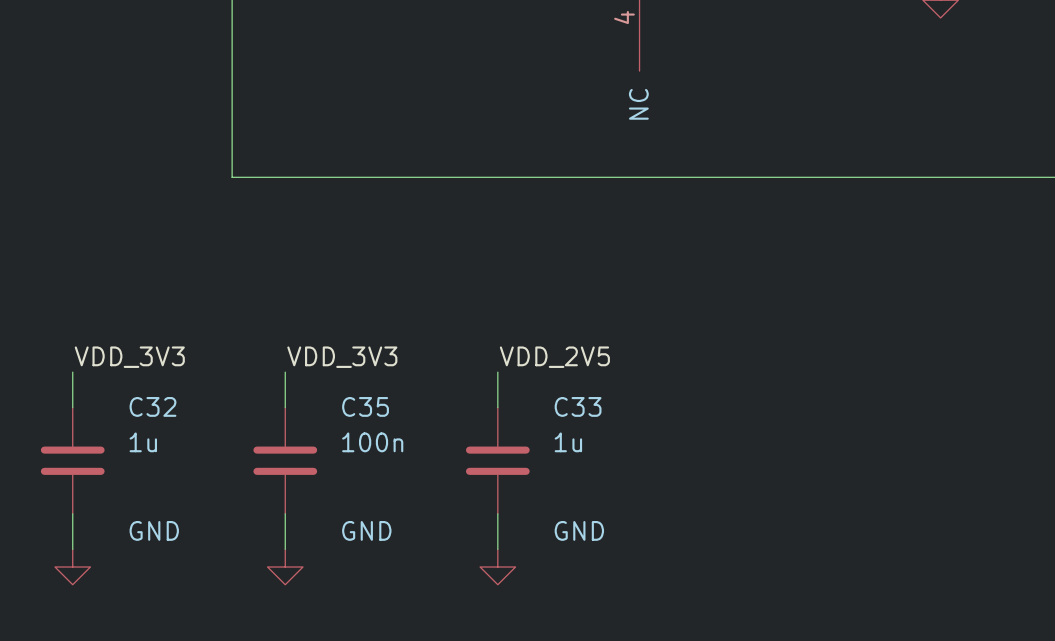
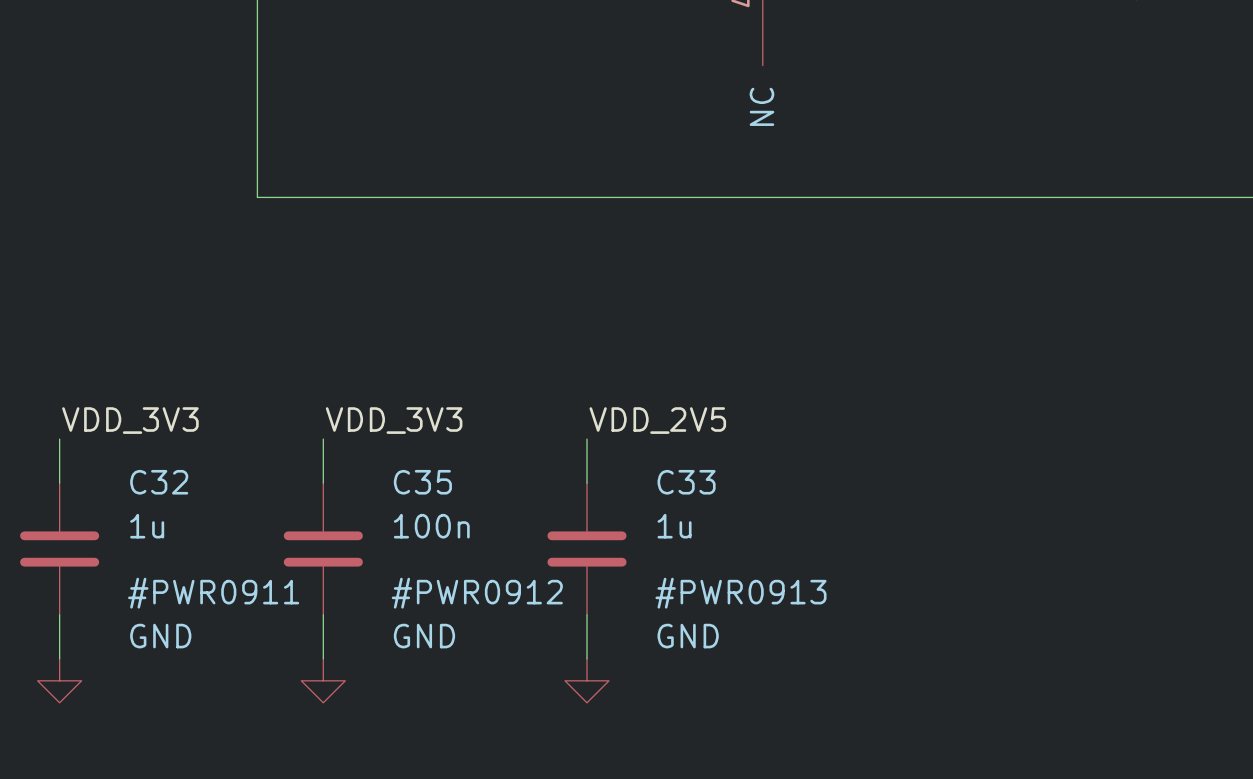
#PWR0911 name: none -> #PWR0911 (213, 593)
#PWR0912 name: none -> #PWR0912 (477, 593)
#PWR0913 name: none -> #PWR0913 (740, 593)

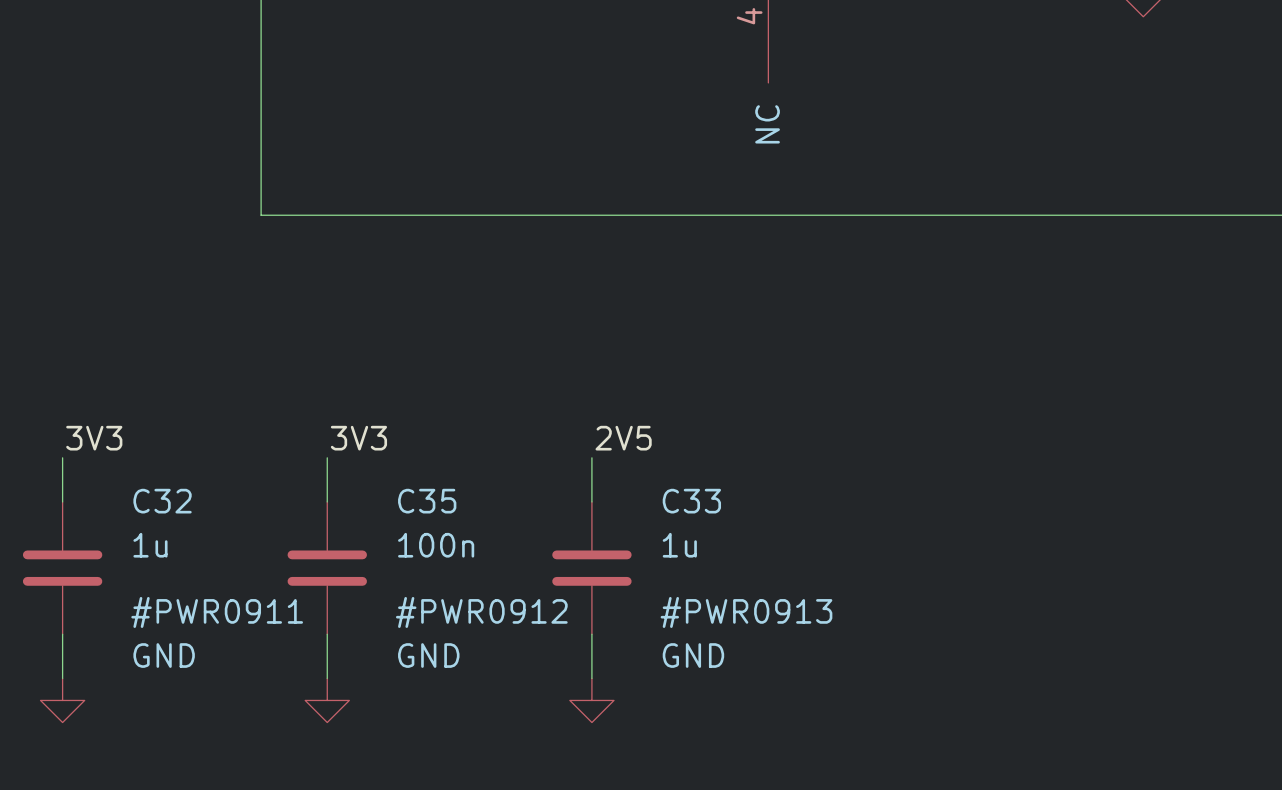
label: VDD_3V3 (130, 420) -> 3V3 (94, 438)
label: VDD_3V3 (394, 420) -> 3V3 (358, 438)
label: VDD_2V5 (657, 420) -> 2V5 (623, 438)

